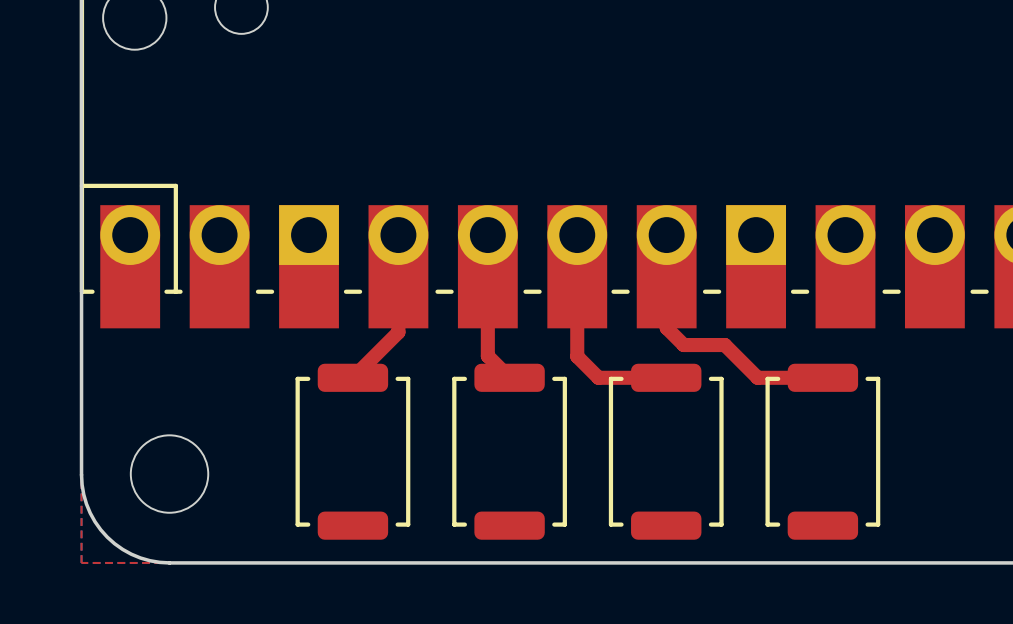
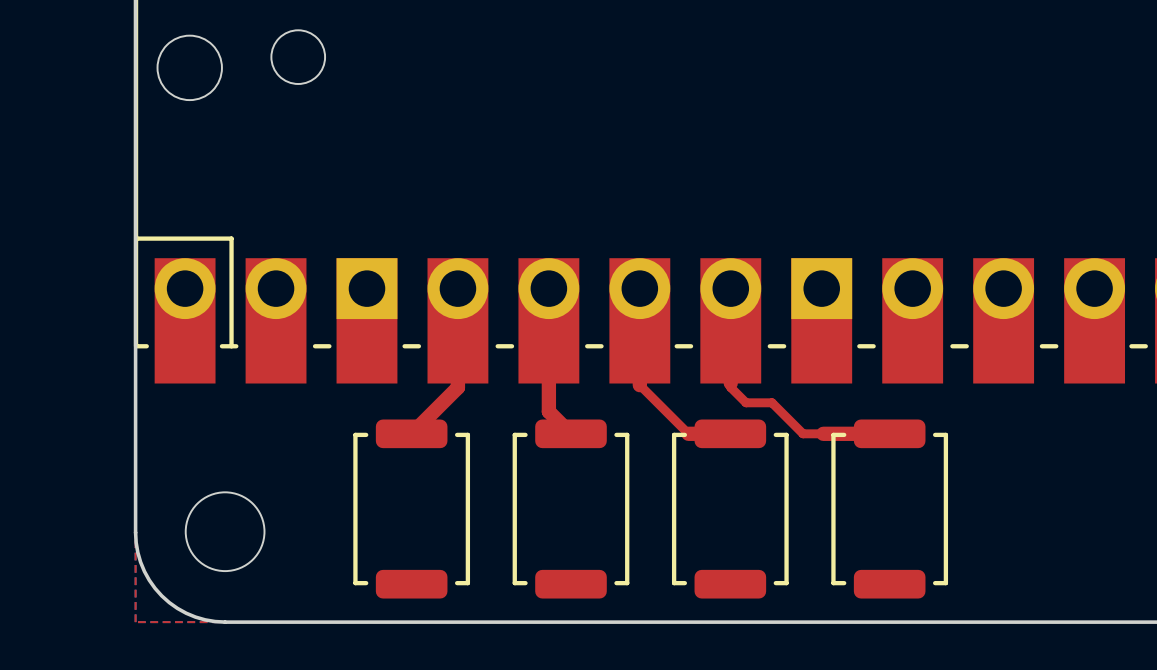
top track: (666, 327) (683, 345) (724, 345) (757, 377) -> (730, 383) (730, 387) (746, 402) (772, 402) (803, 433) (823, 433)
top track: (577, 329) (577, 356) (598, 377) (625, 377) -> (639, 385) (688, 433)

